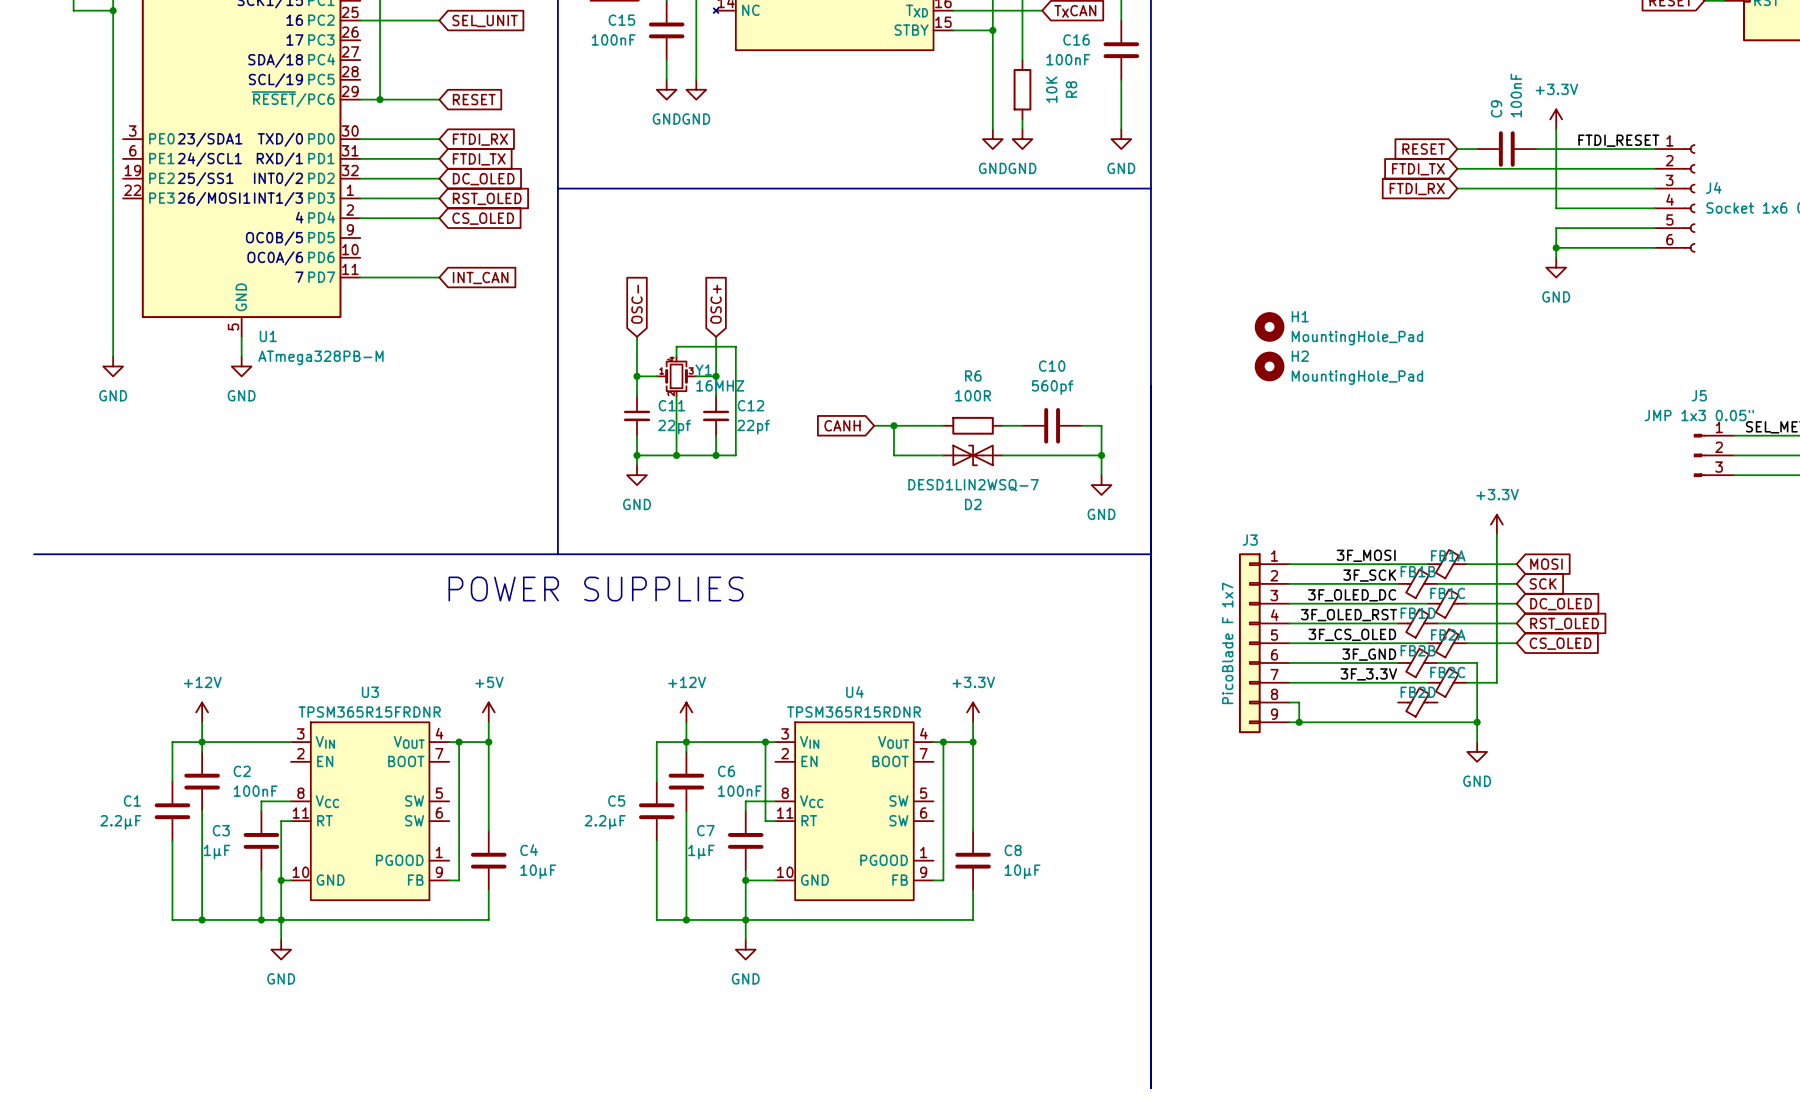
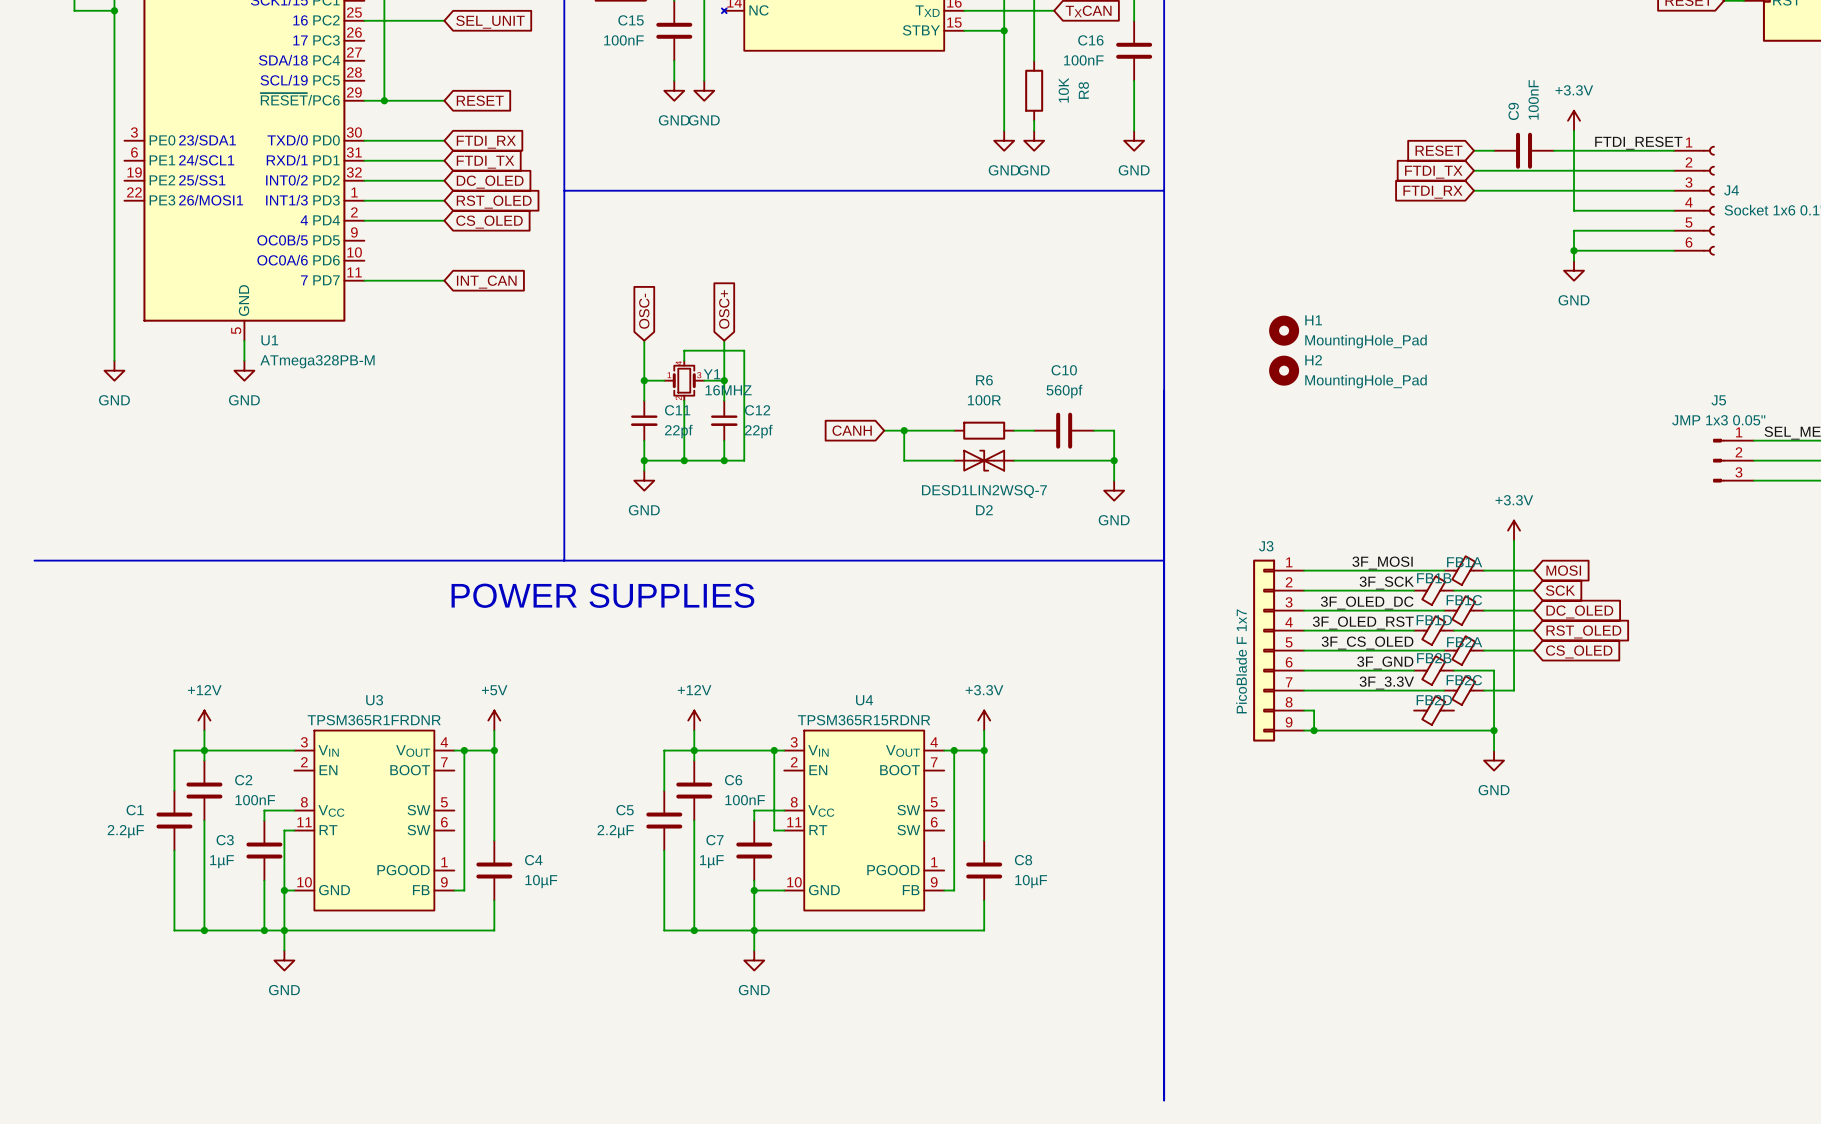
U3 value: TPSM365R15FRDNR (369, 712) -> TPSM365R1FRDNR (374, 720)

